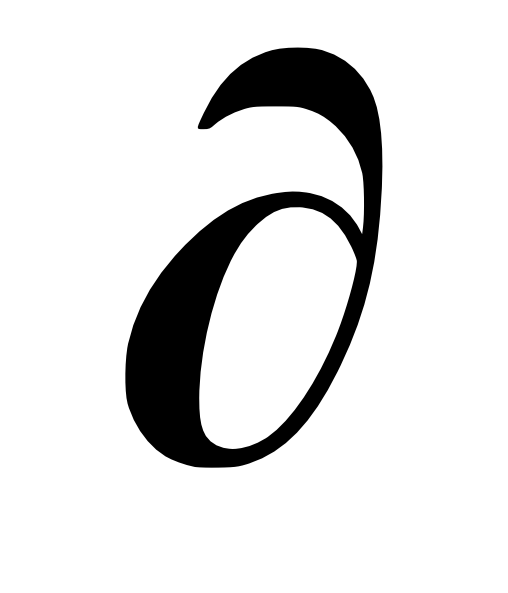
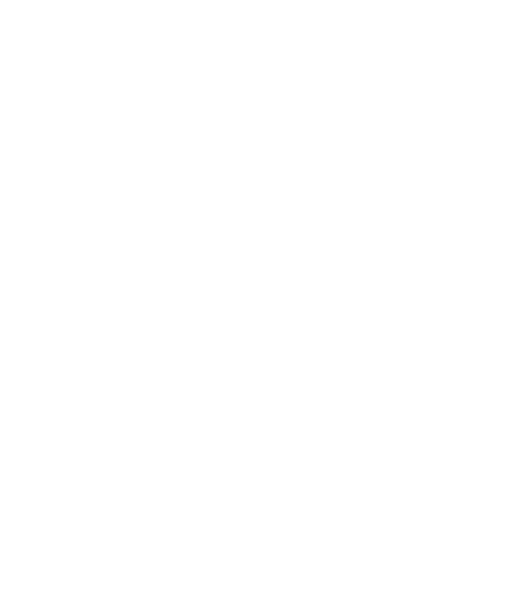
drawing: [125, 47, 383, 468] -> none

